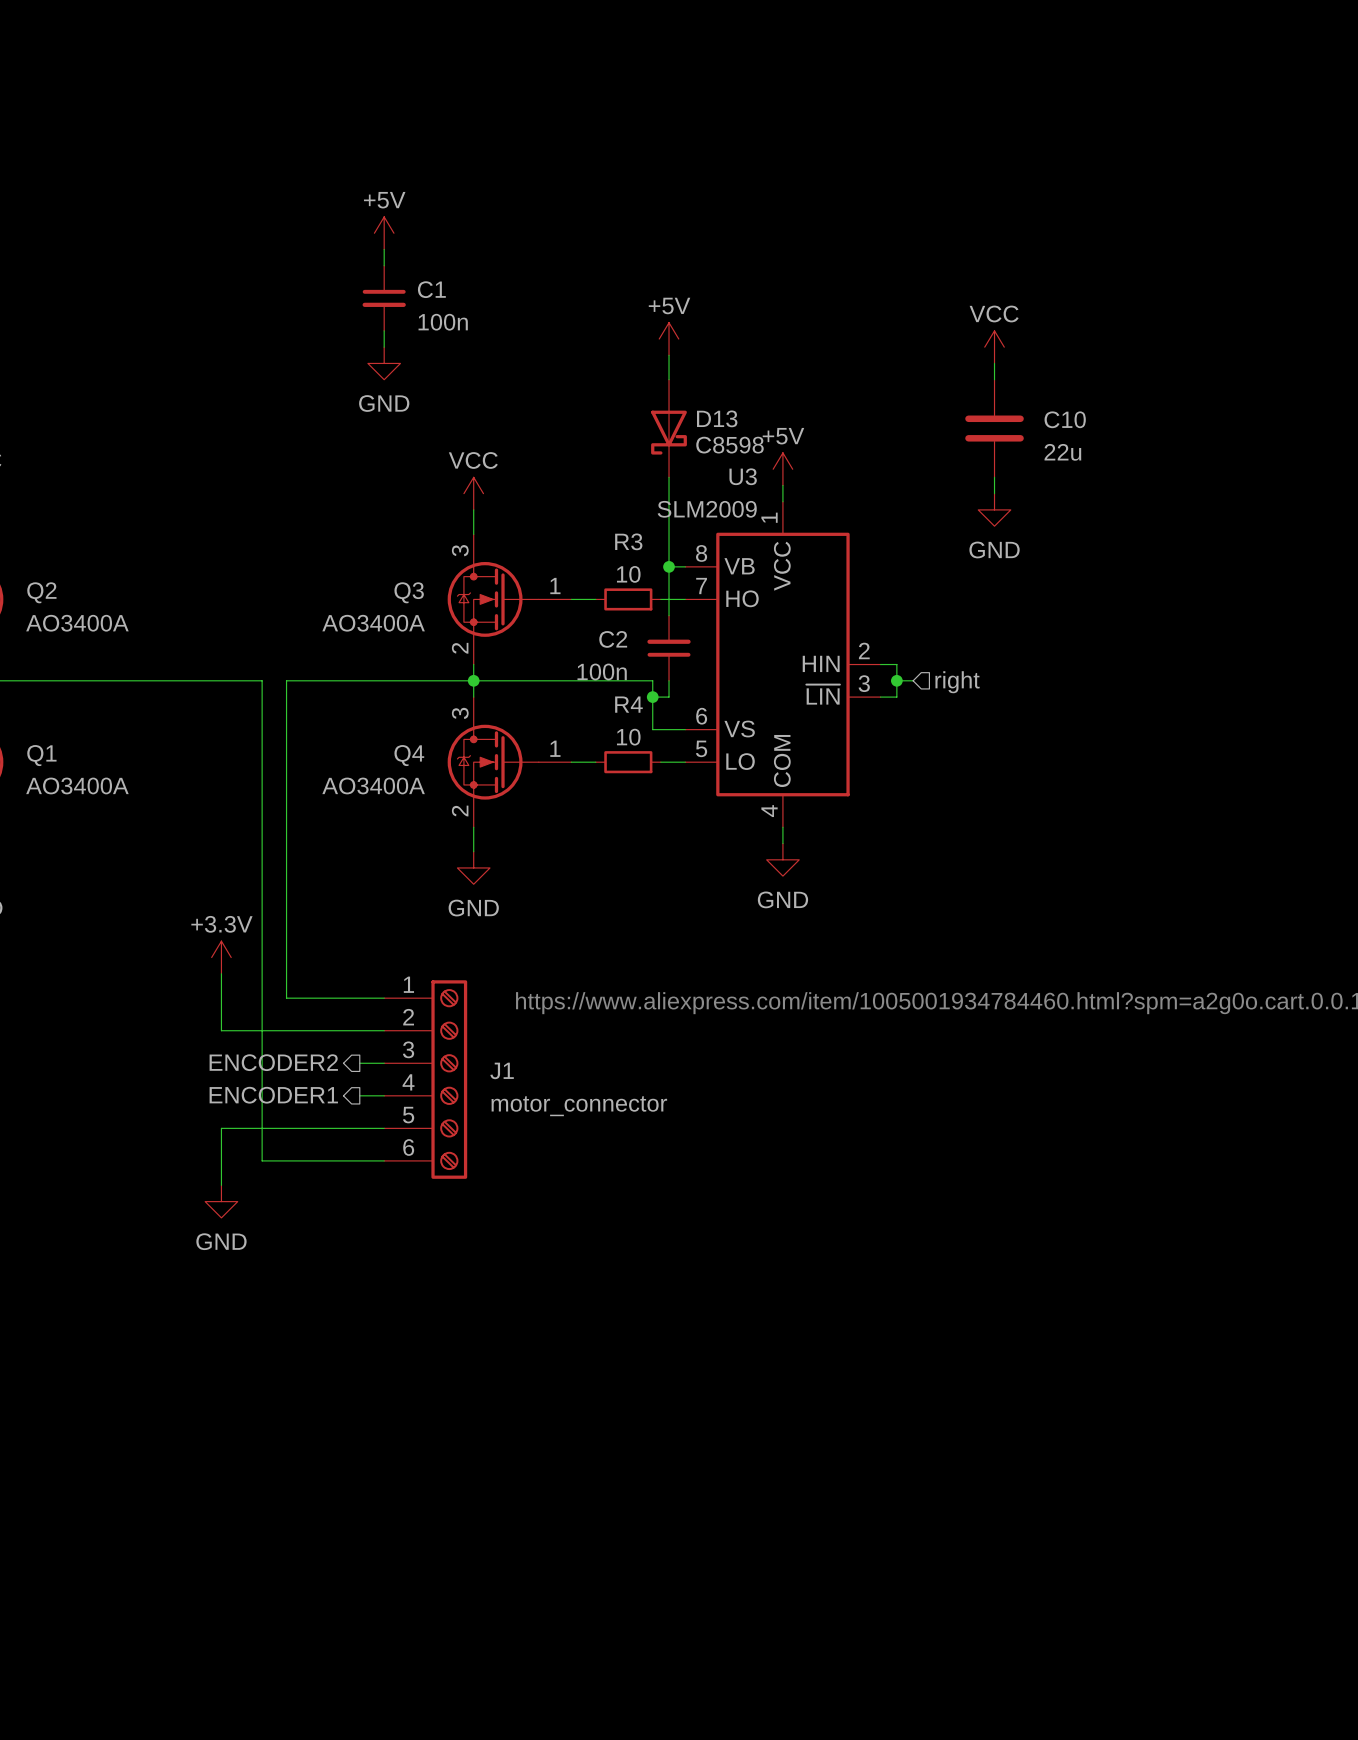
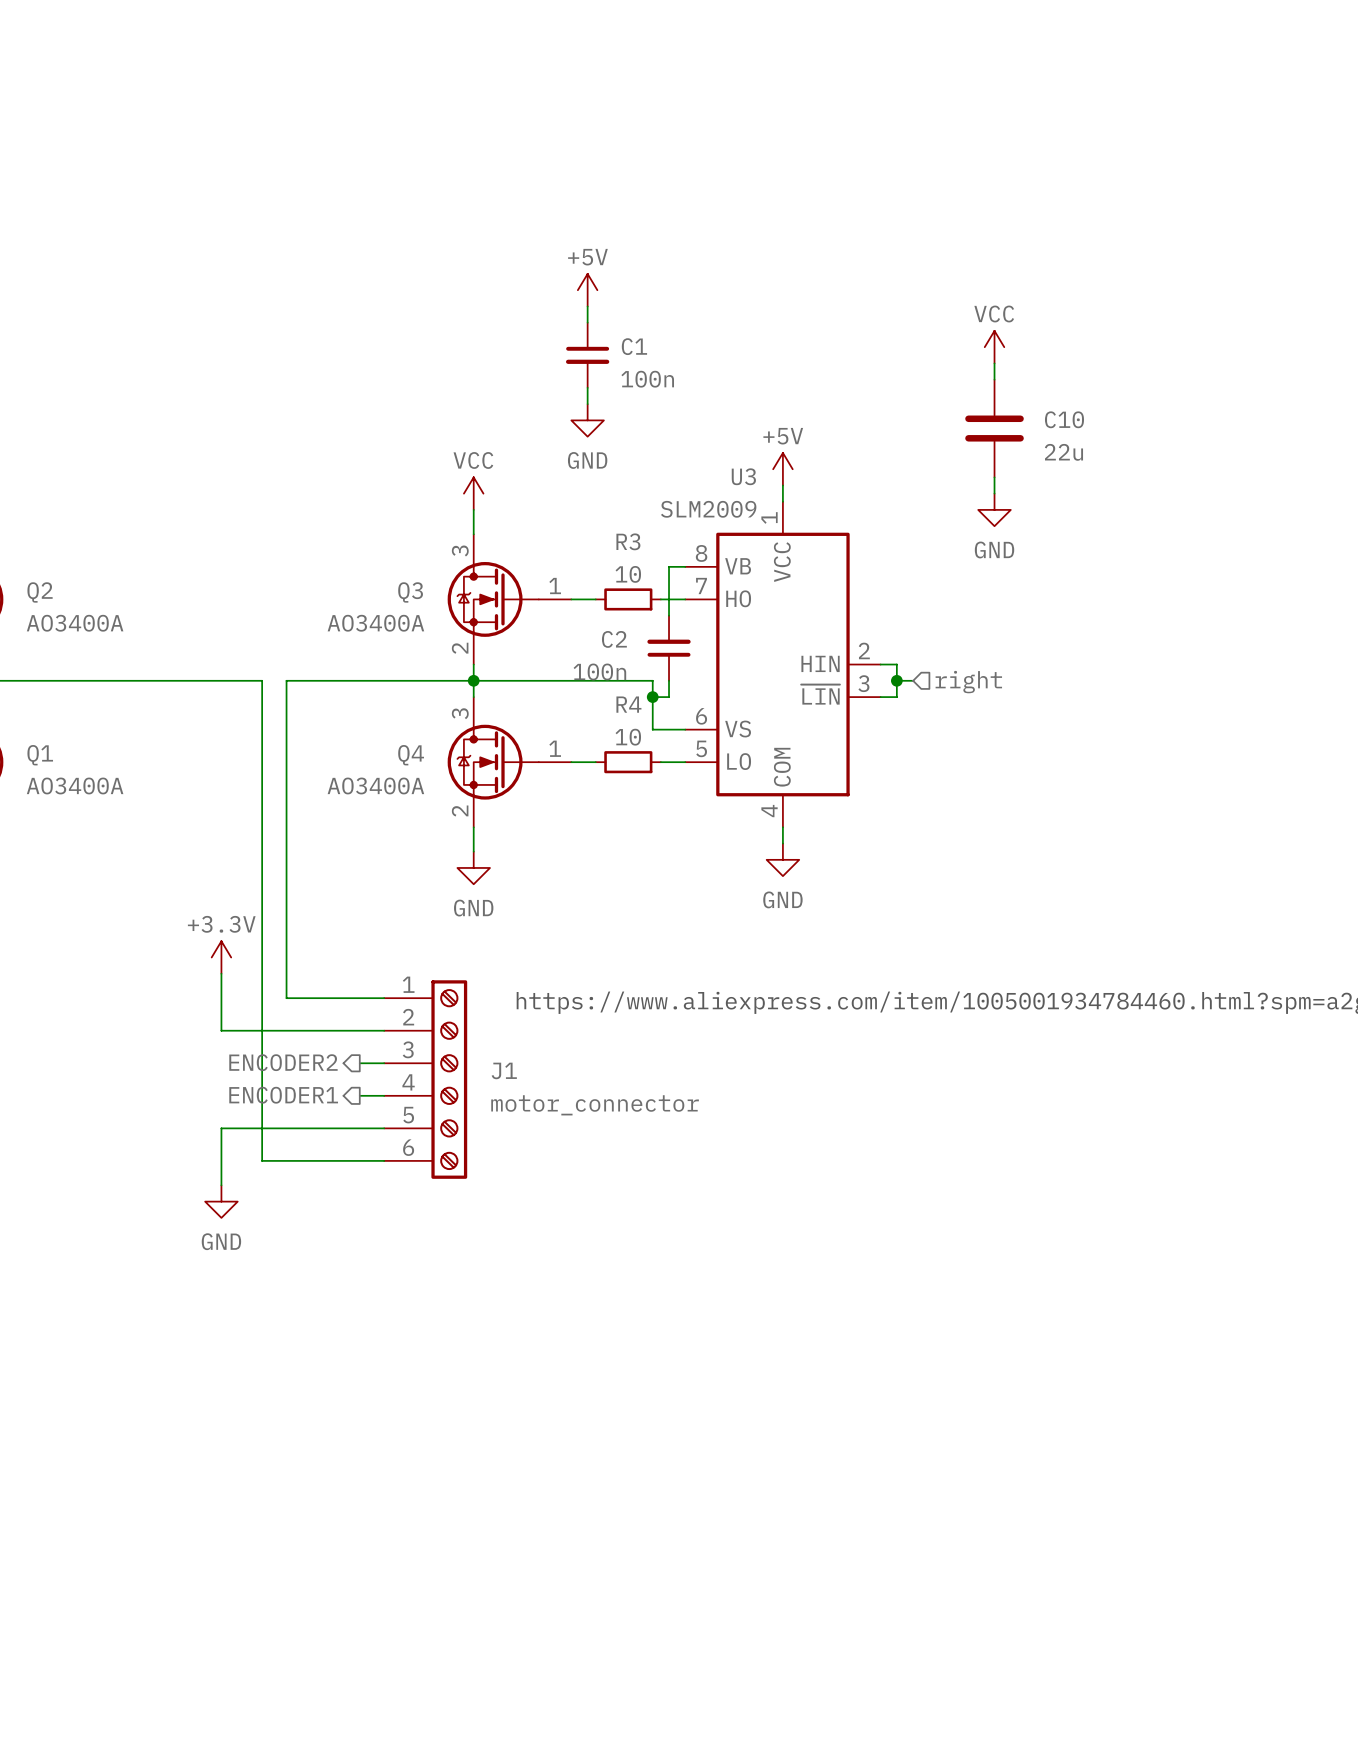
power symbol: +5V (384, 233) -> none
wire: (384, 249) (384, 265) -> (587, 387) (587, 404)
C1 position: (384, 298) -> (587, 355)
wire: (384, 330) (384, 347) -> (587, 306) (587, 322)
power symbol position: +5V (669, 339) -> +5V (587, 290)
wire: (669, 355) (669, 379) -> none
power symbol position: GND (384, 363) -> GND (587, 420)
D13: C8598 (669, 428) -> none
wire: (669, 477) (669, 566) -> none
junction: (669, 566) -> none

